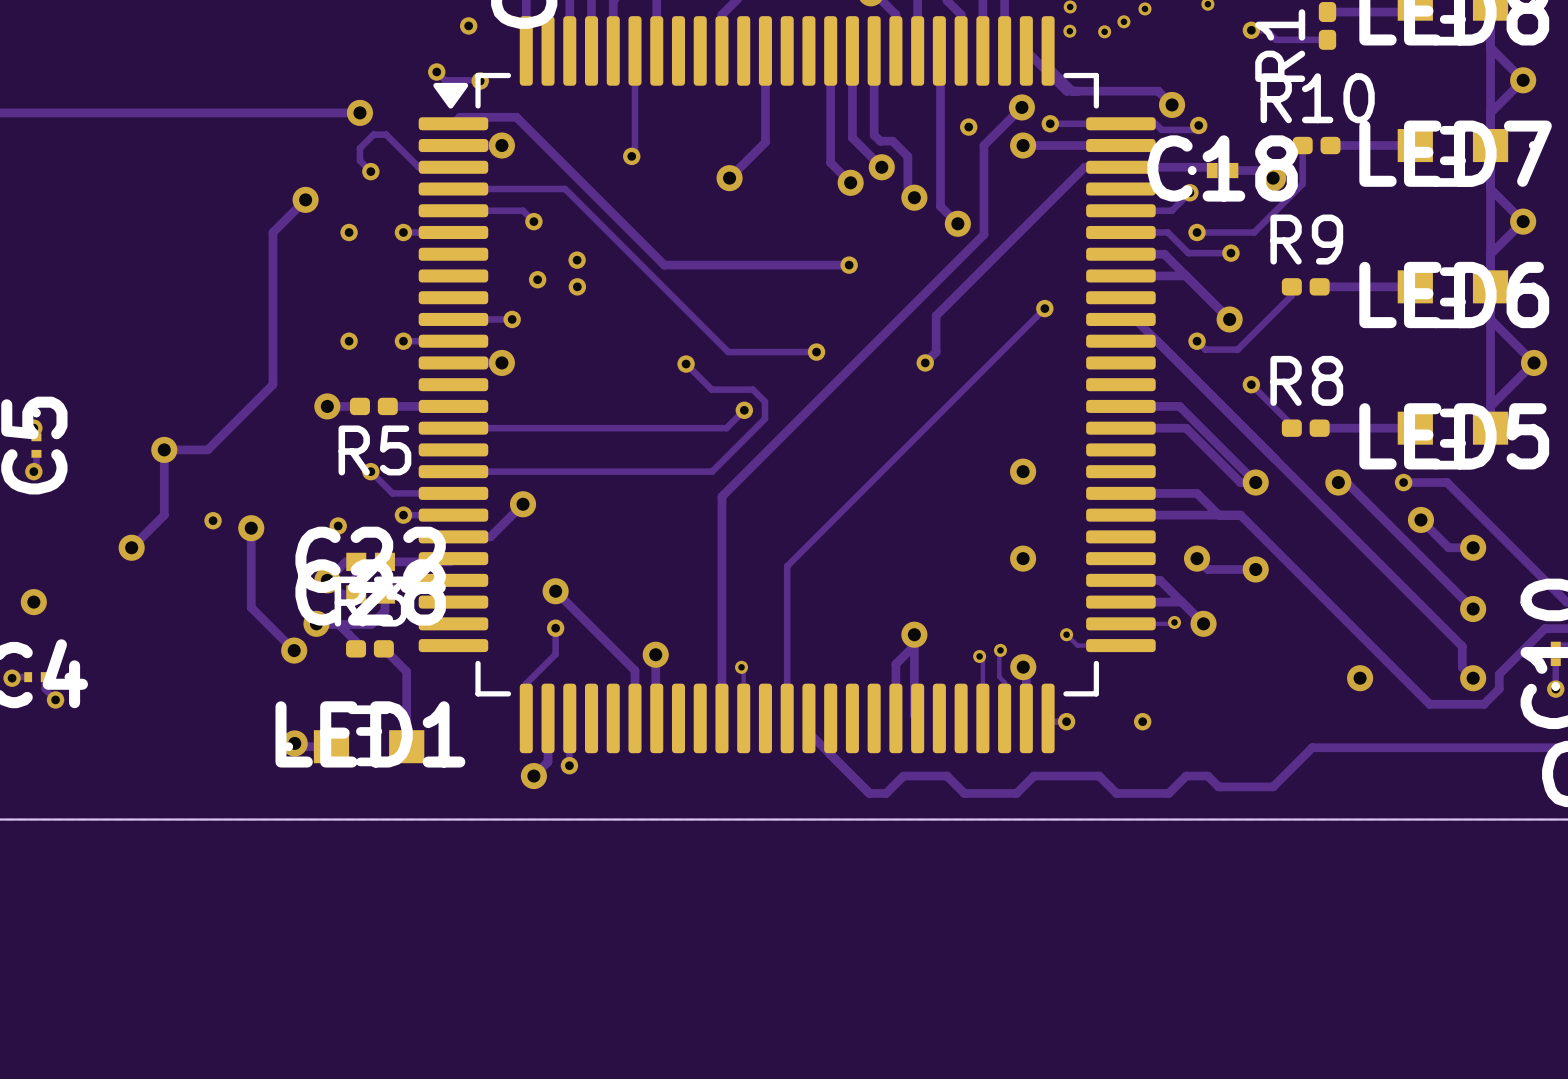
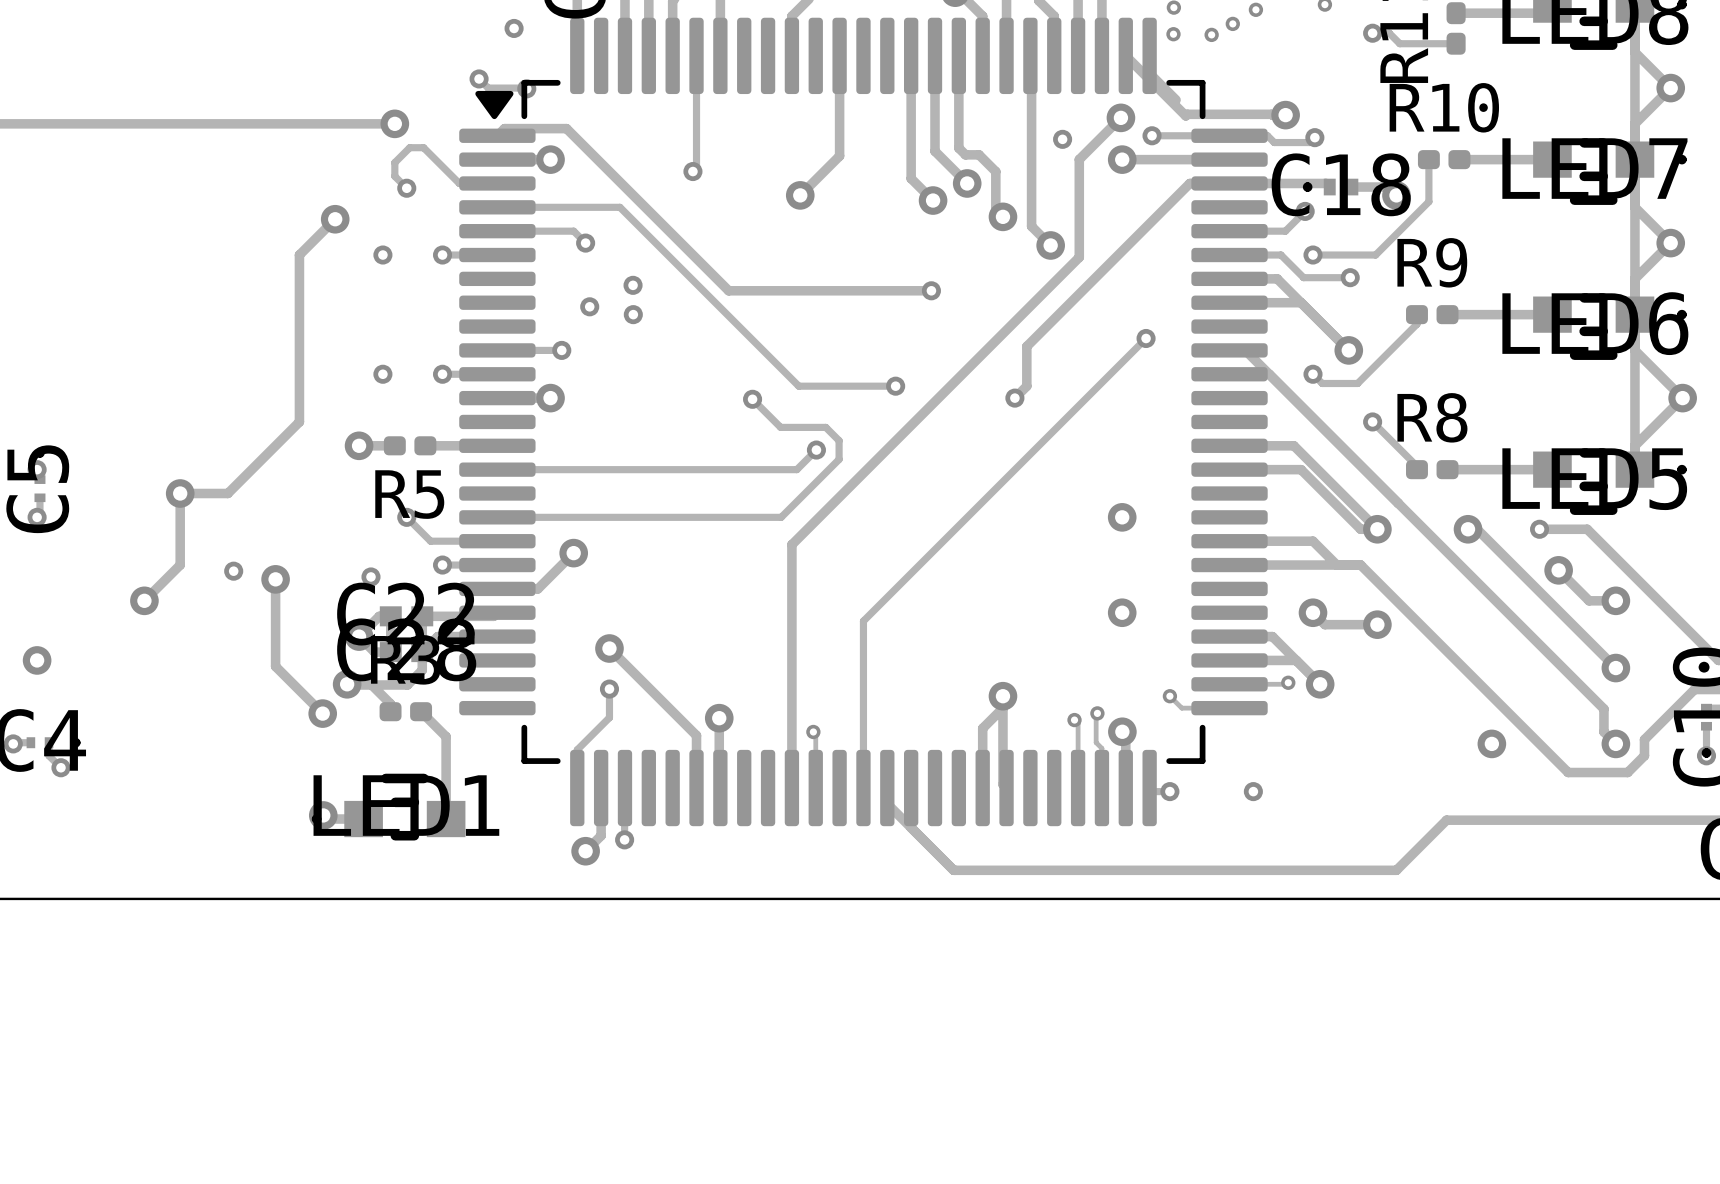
track: (1066, 91) (1158, 91) (1172, 104) -> (1169, 100) (1185, 115) (1187, 114) (1285, 115)
track: (1318, 747) (1312, 747) (1273, 786) (1218, 786) (1207, 776) (1186, 776) (1168, 793) -> (1446, 820) (1396, 870) (1282, 870)
track: (886, 793) (903, 776) (947, 776) (964, 793) -> (971, 870) (1057, 870)
track: (1016, 793) (1033, 776) (1099, 776) (1116, 793) -> (1115, 870) (1224, 870)

